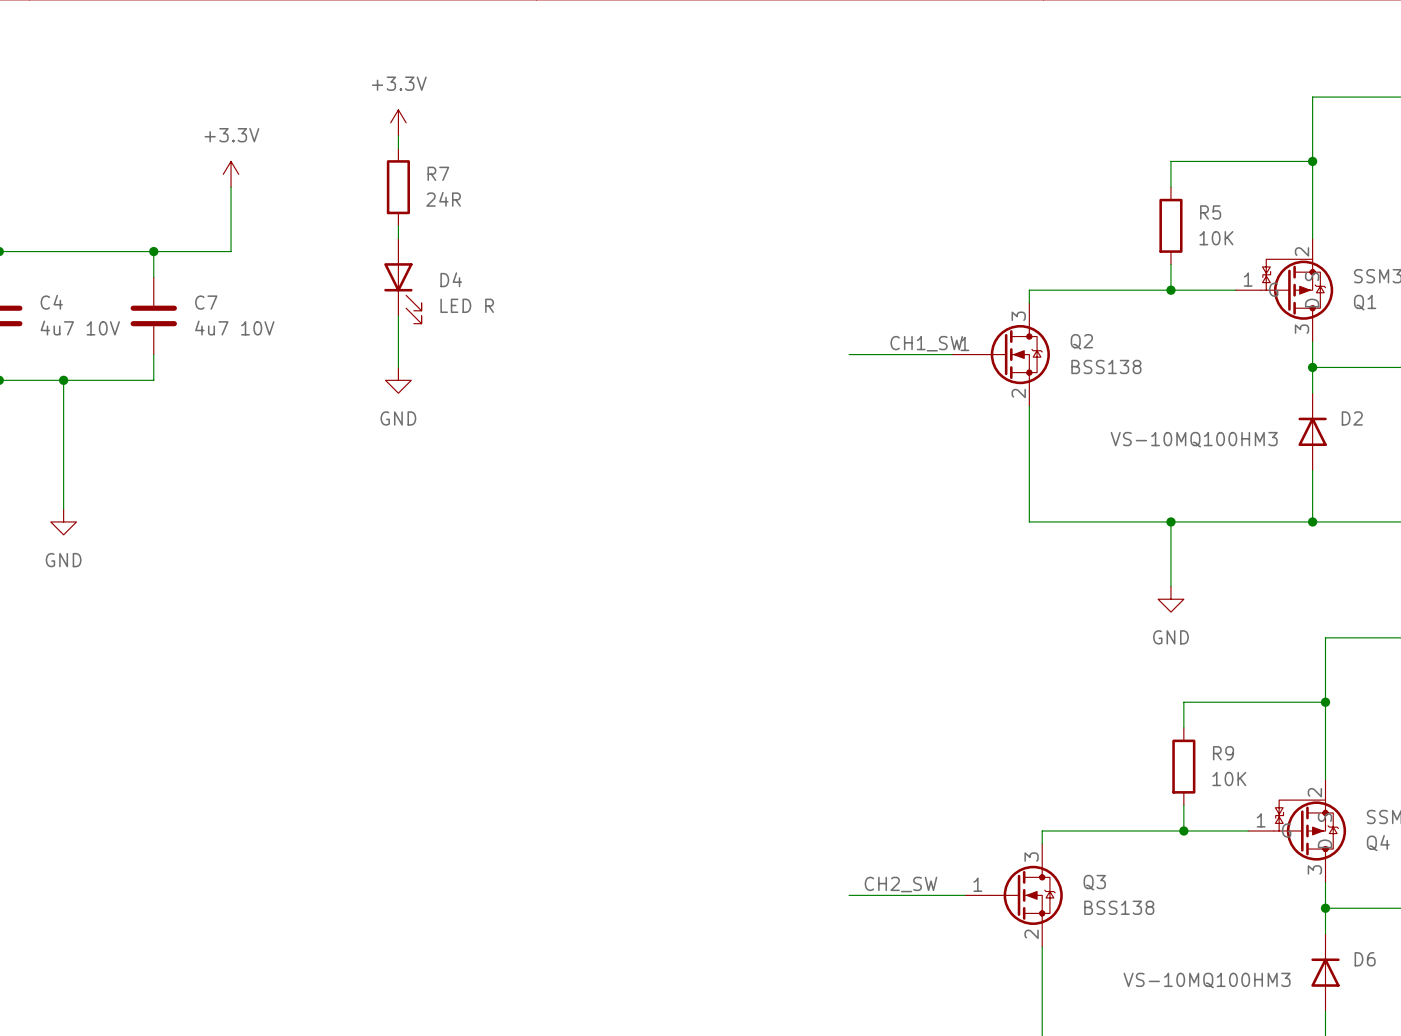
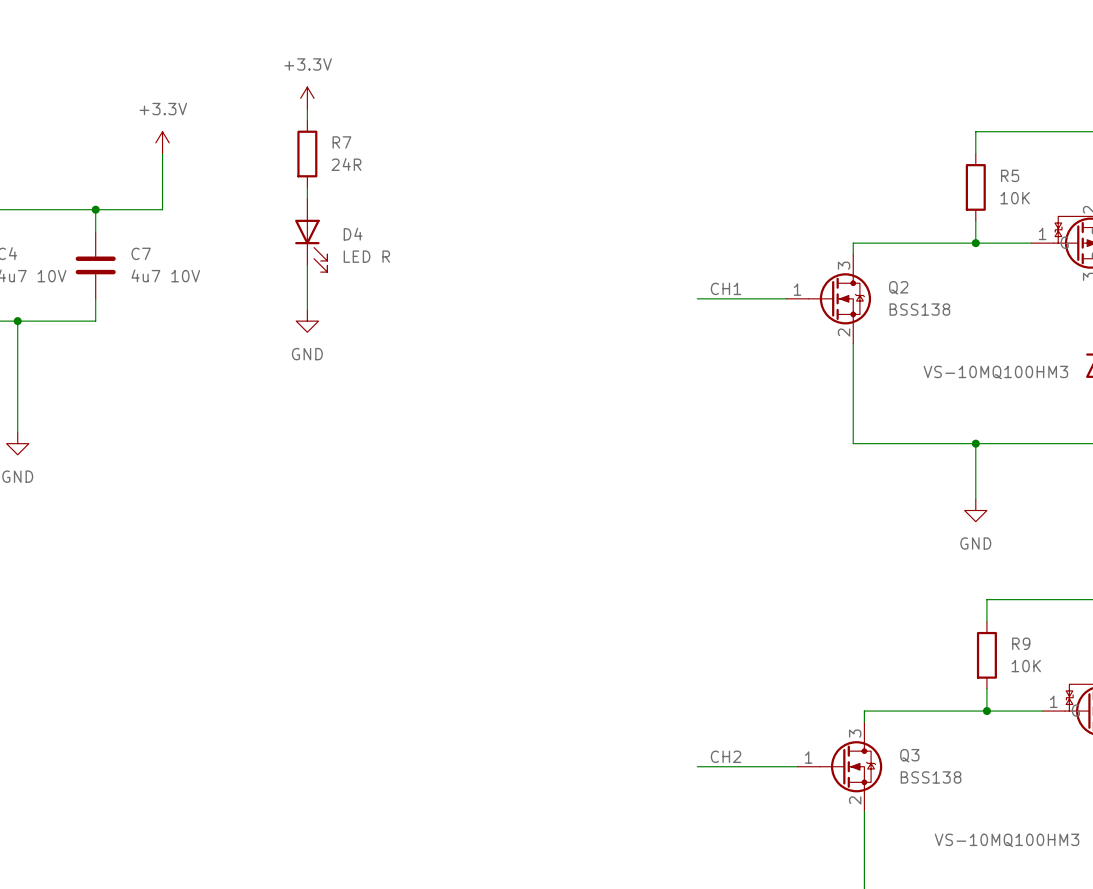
label: CH1_SW (926, 343) -> CH1 (726, 288)
label: CH2_SW (900, 884) -> CH2 (726, 756)

